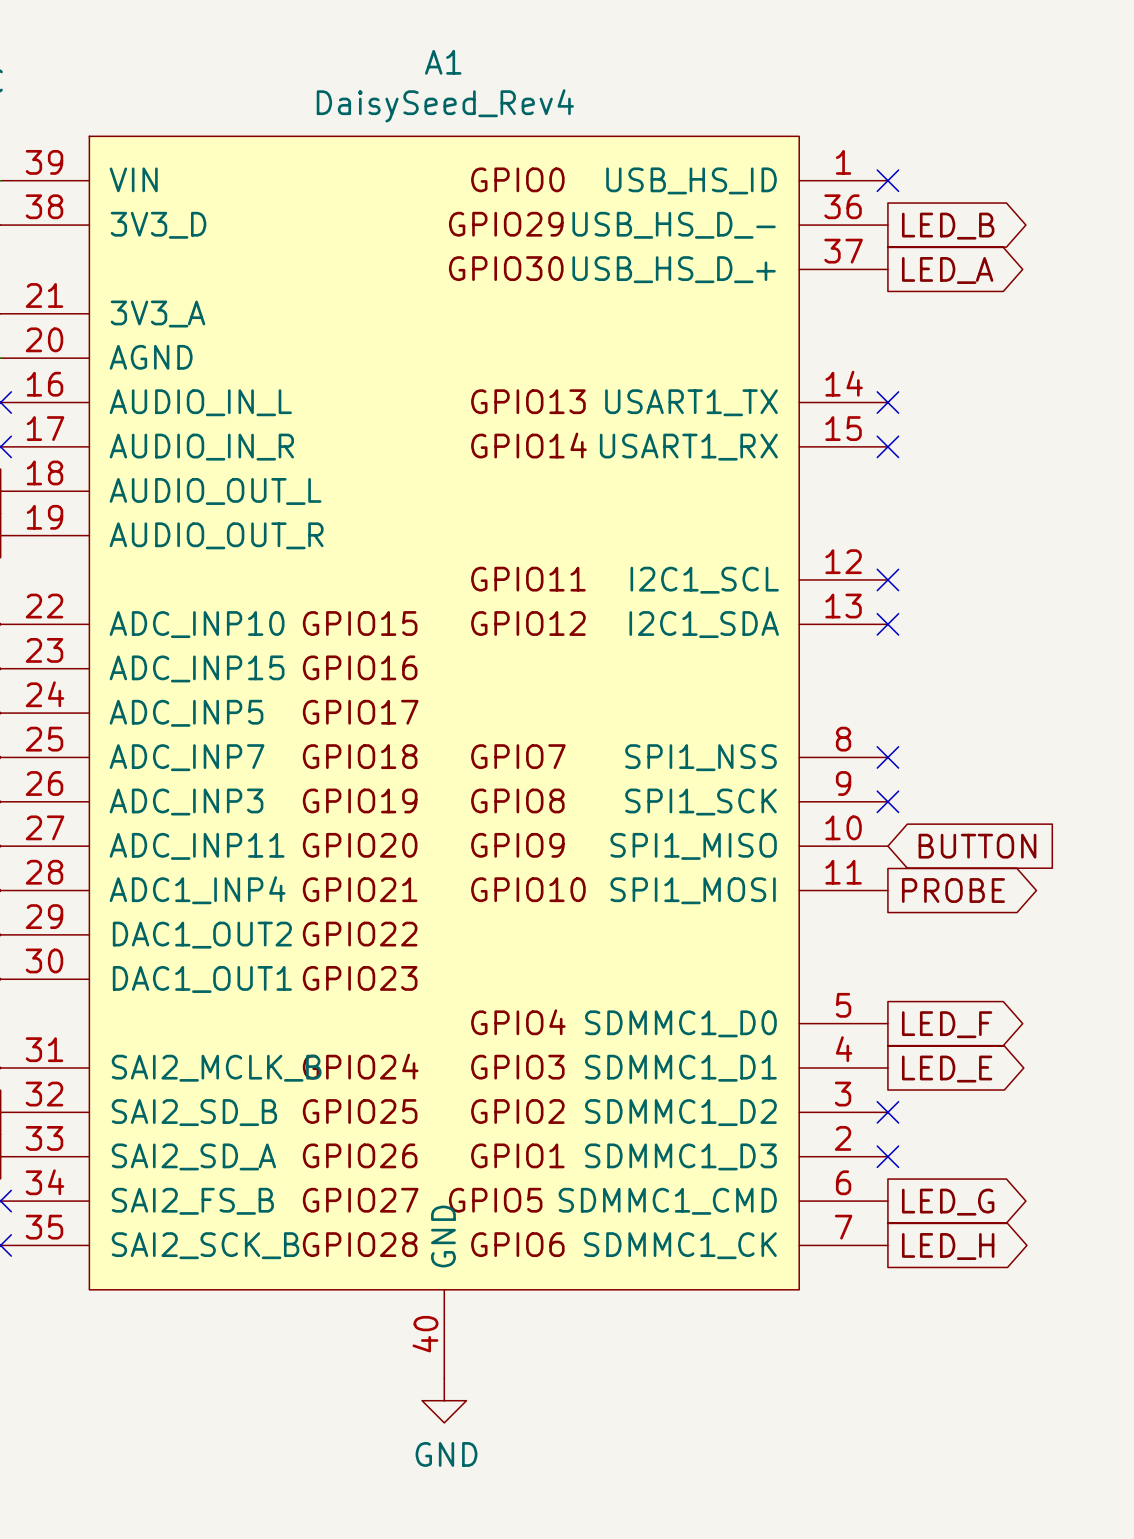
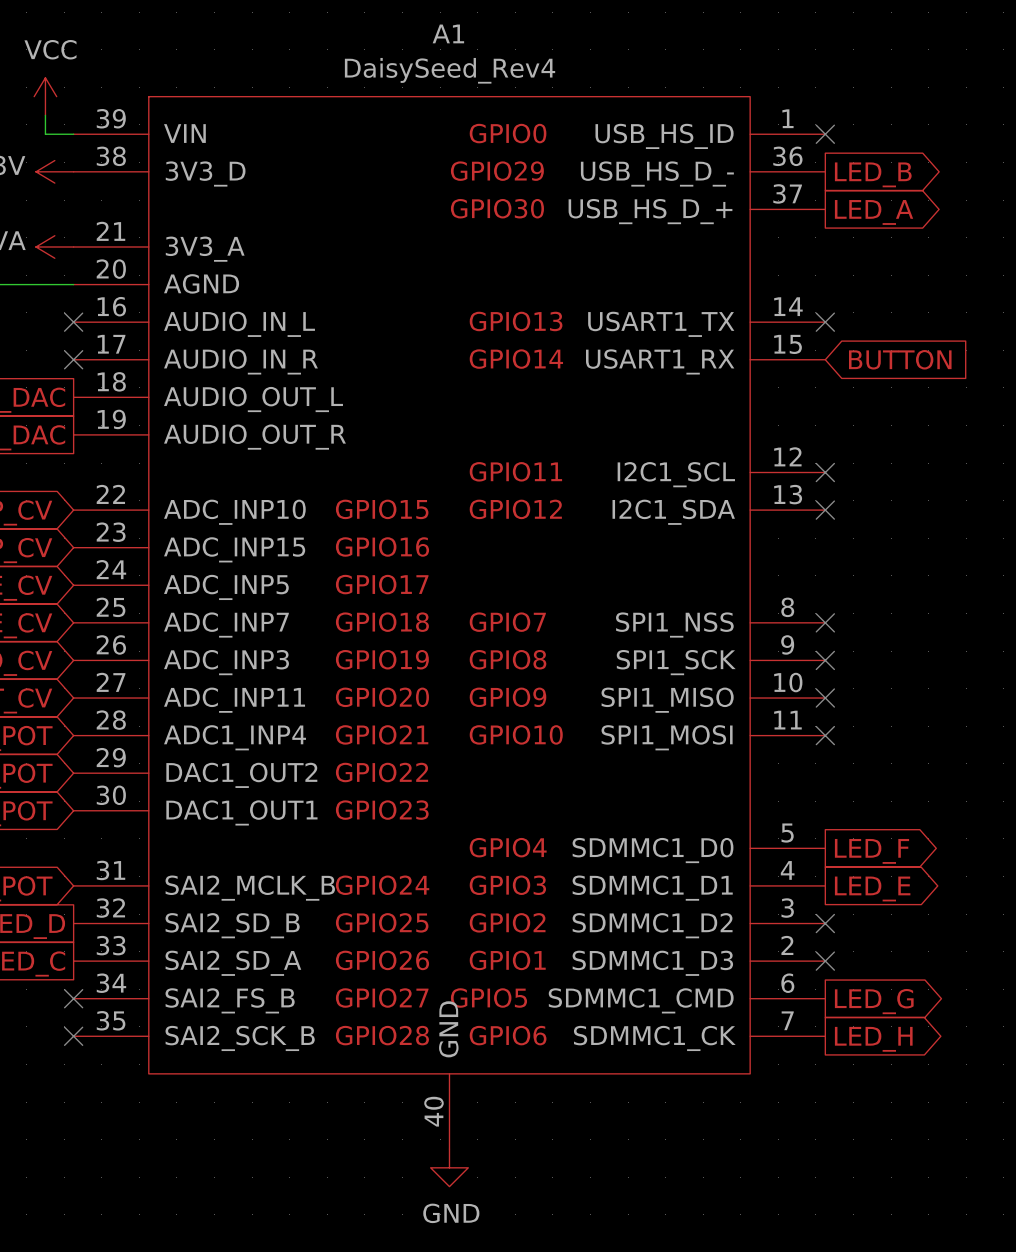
no-connect mark: (887, 446) -> none
no-connect mark: none -> (825, 698)
global label position: BUTTON (977, 846) -> BUTTON (900, 359)
no-connect mark: none -> (825, 735)
global label: PROBE (953, 890) -> none

